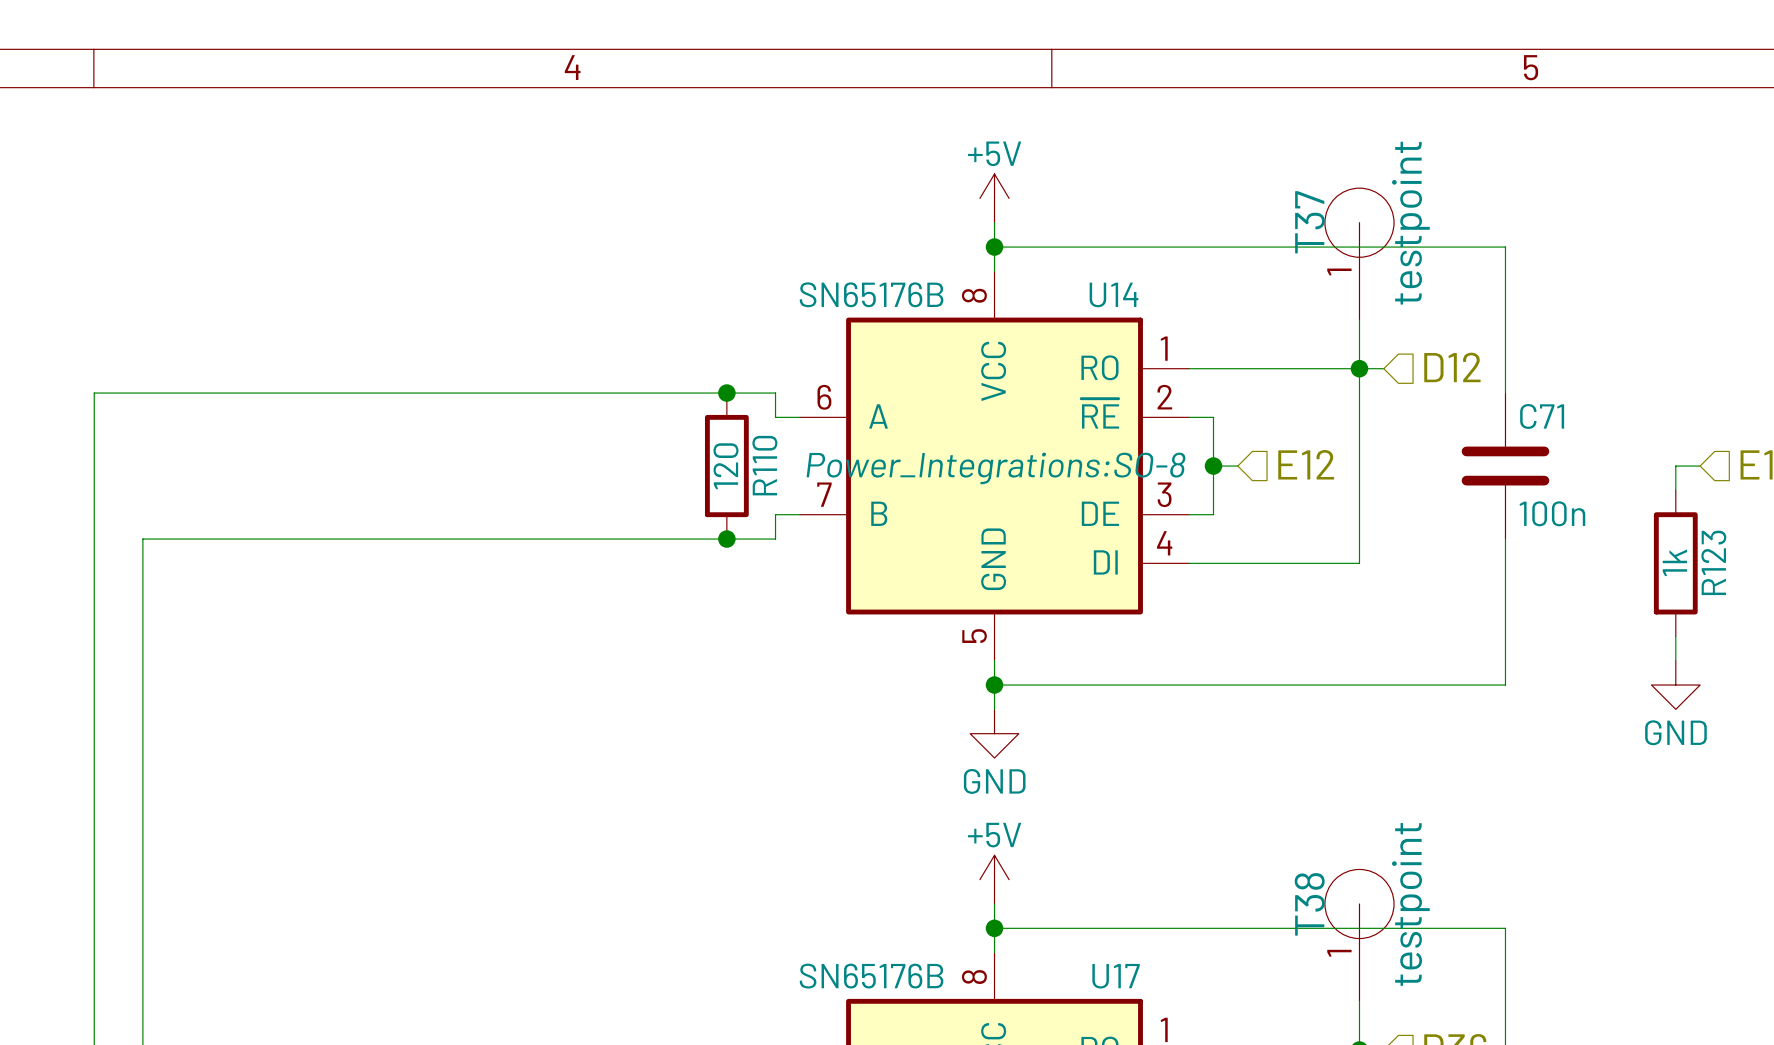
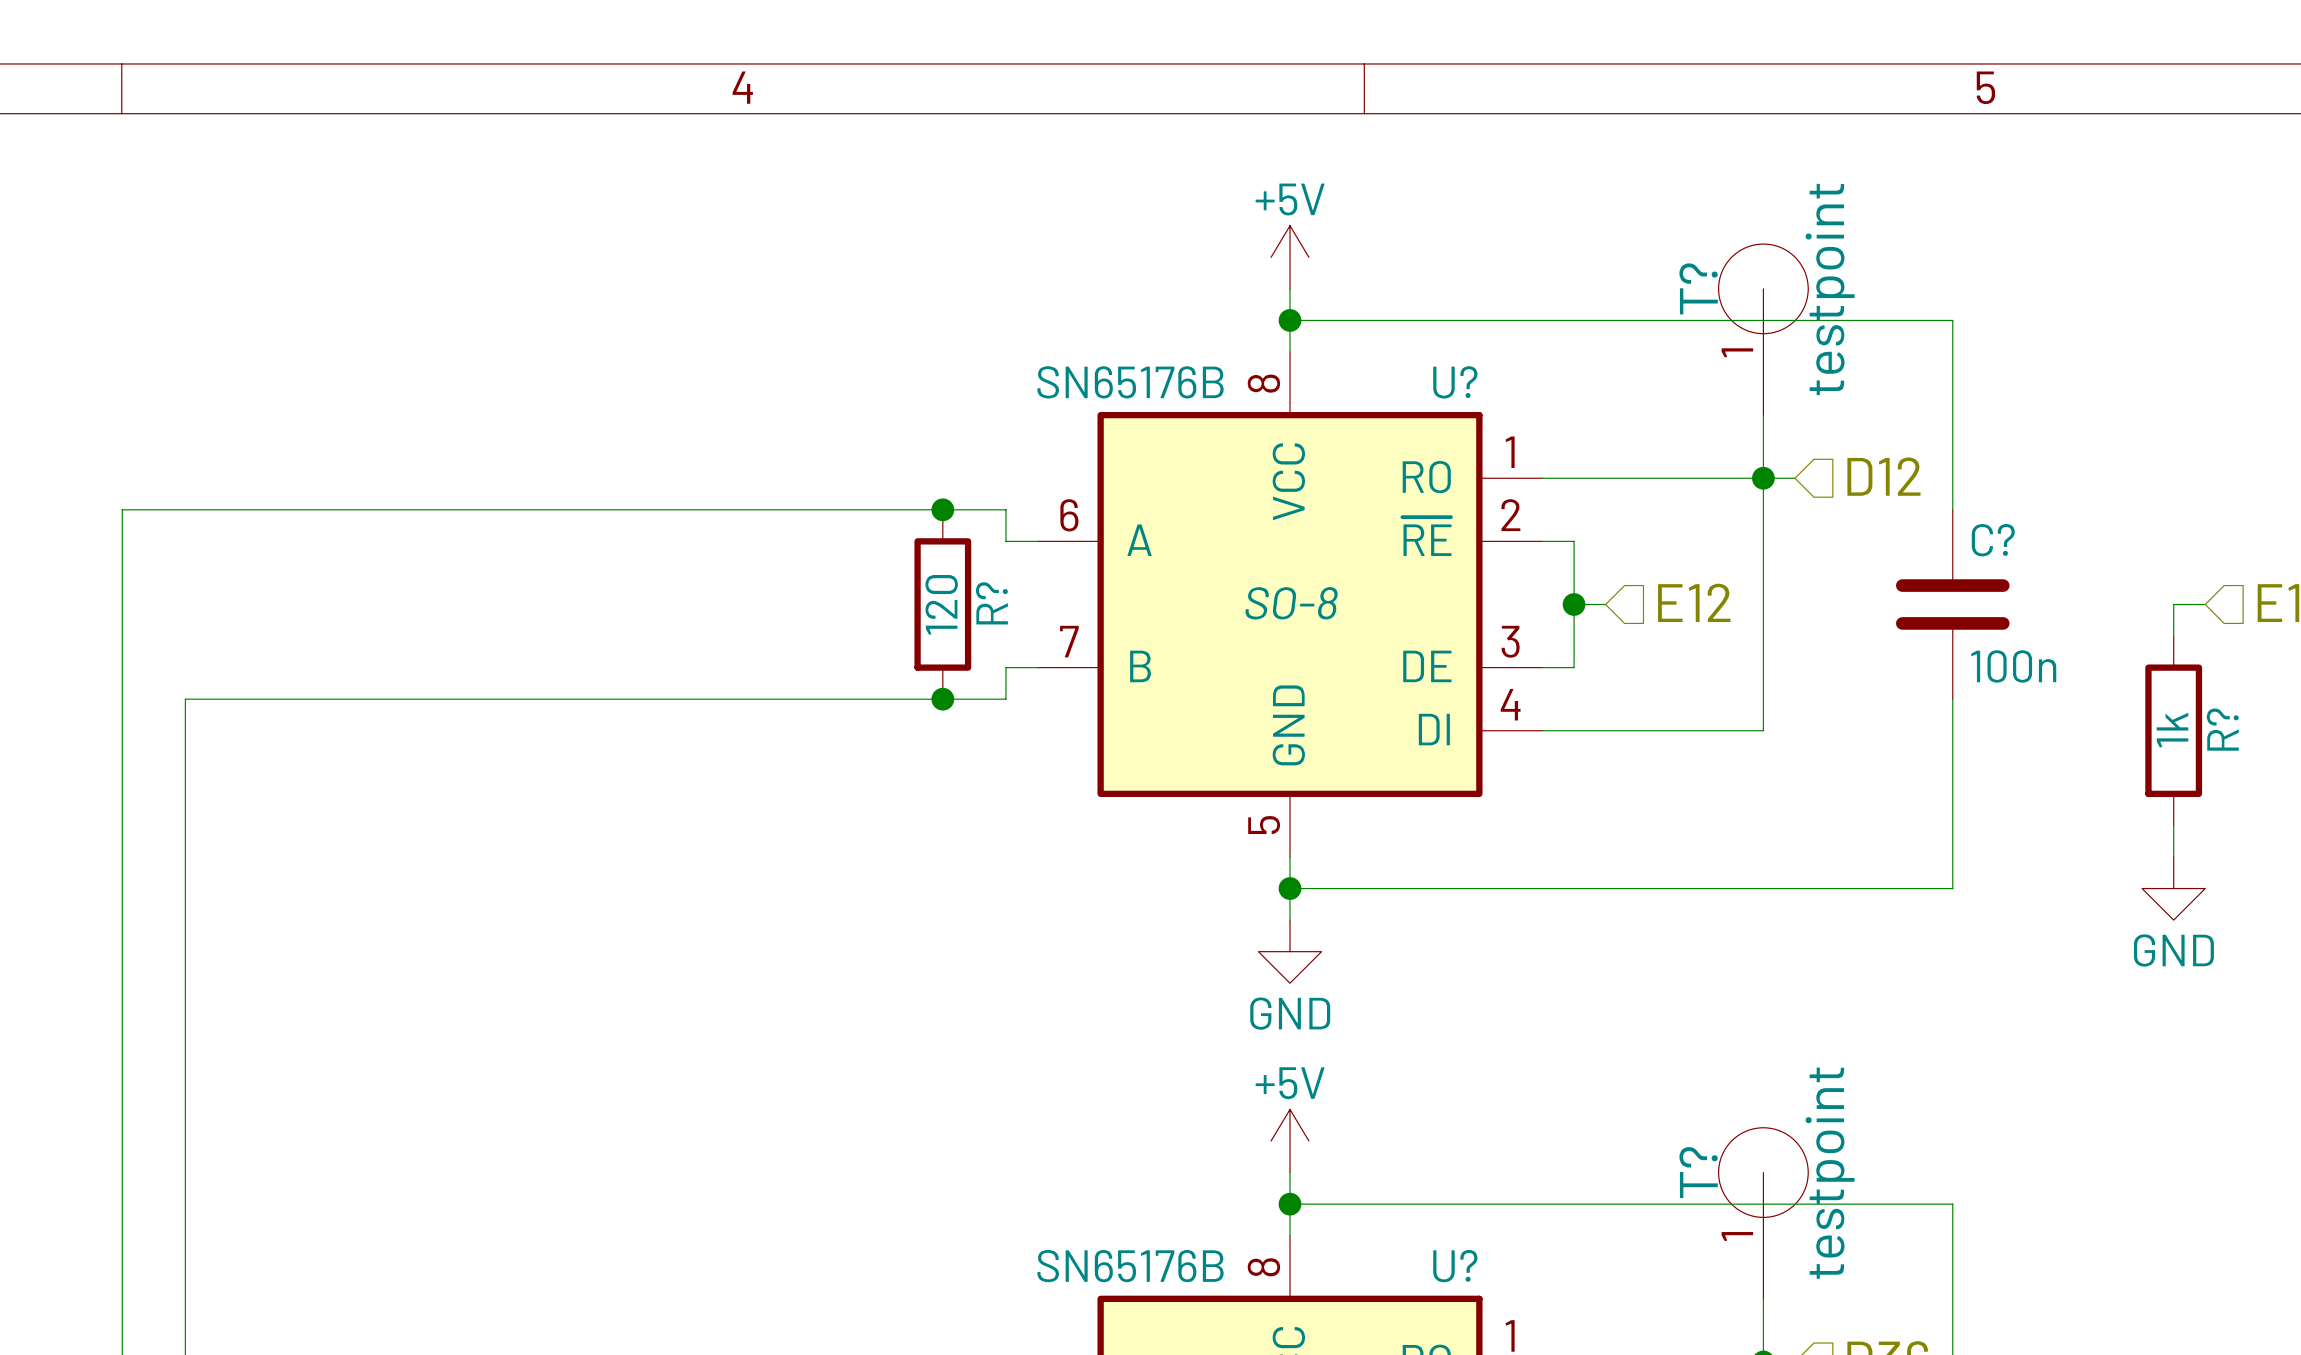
T37 name: T37 (1309, 222) -> T? (1698, 288)
U14 name: U14 (1114, 294) -> U? (1455, 382)
C71 name: C71 (1542, 416) -> C? (1993, 540)
R110 name: R110 (764, 465) -> R? (991, 603)
U14 text: Power_Integrations:SO-8 (996, 468) -> SO-8 (1291, 603)
R123 name: R123 (1713, 562) -> R? (2222, 729)
T38 name: T38 (1309, 904) -> T? (1698, 1172)
U17 name: U17 (1116, 976) -> U? (1455, 1266)

